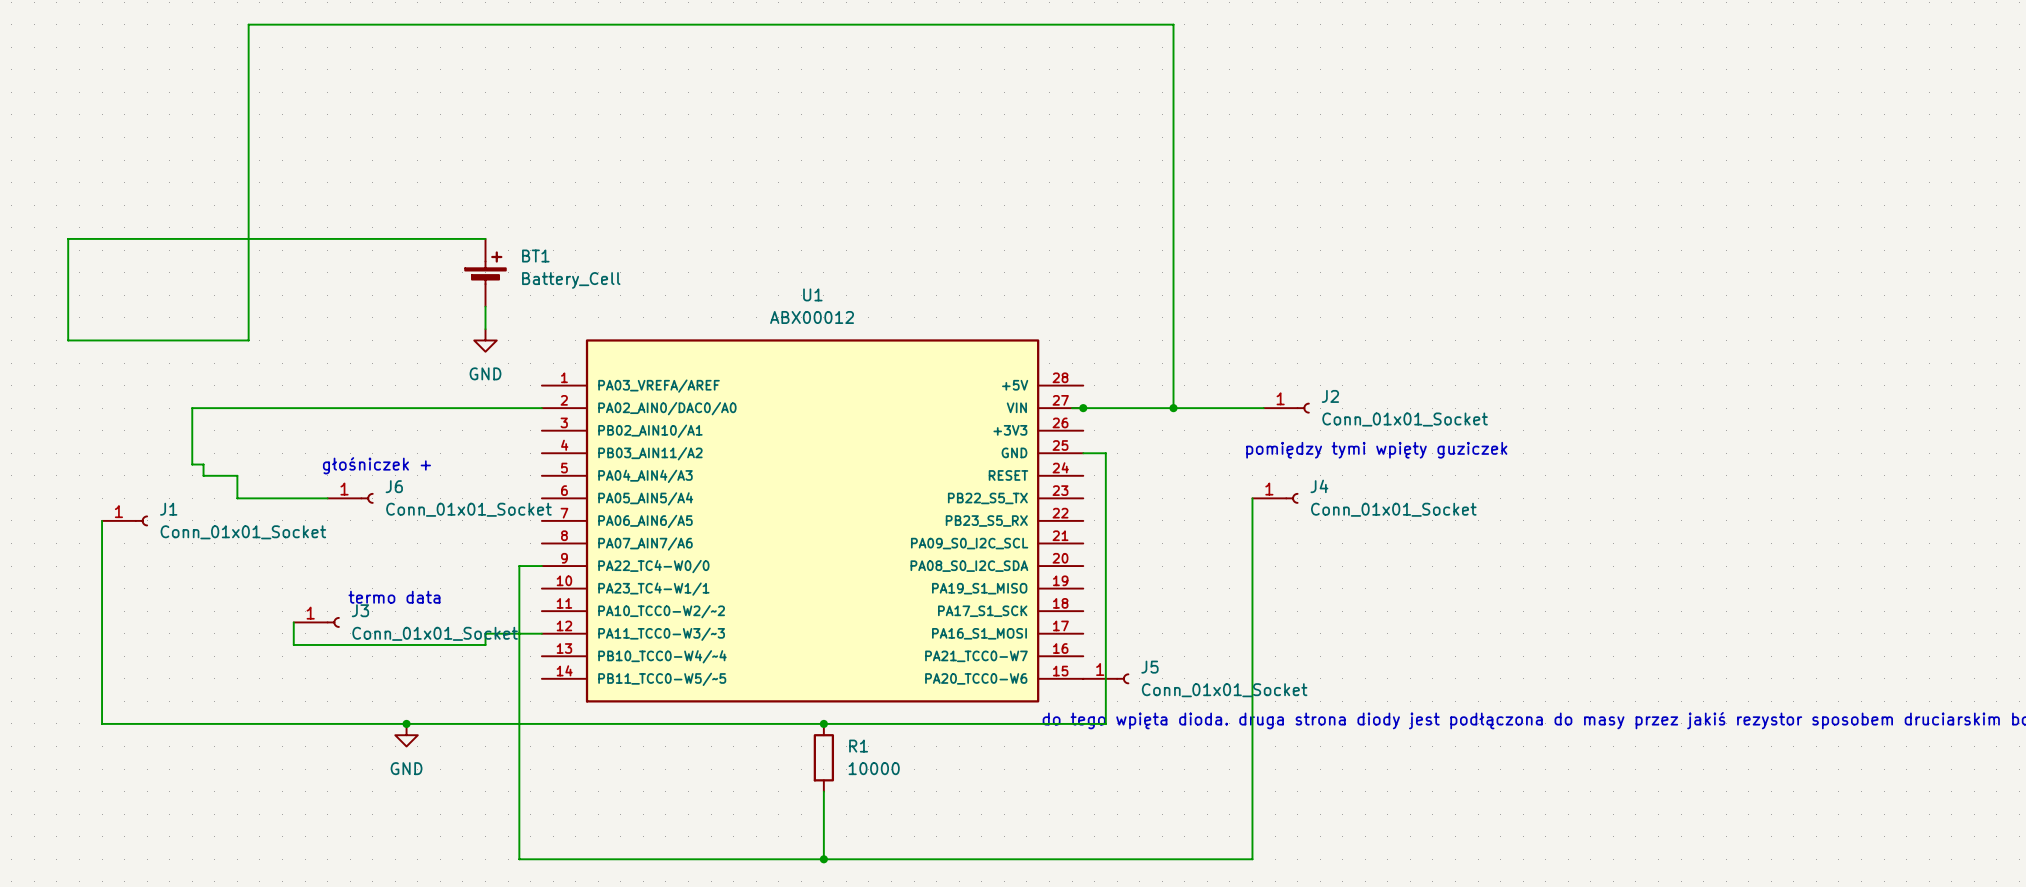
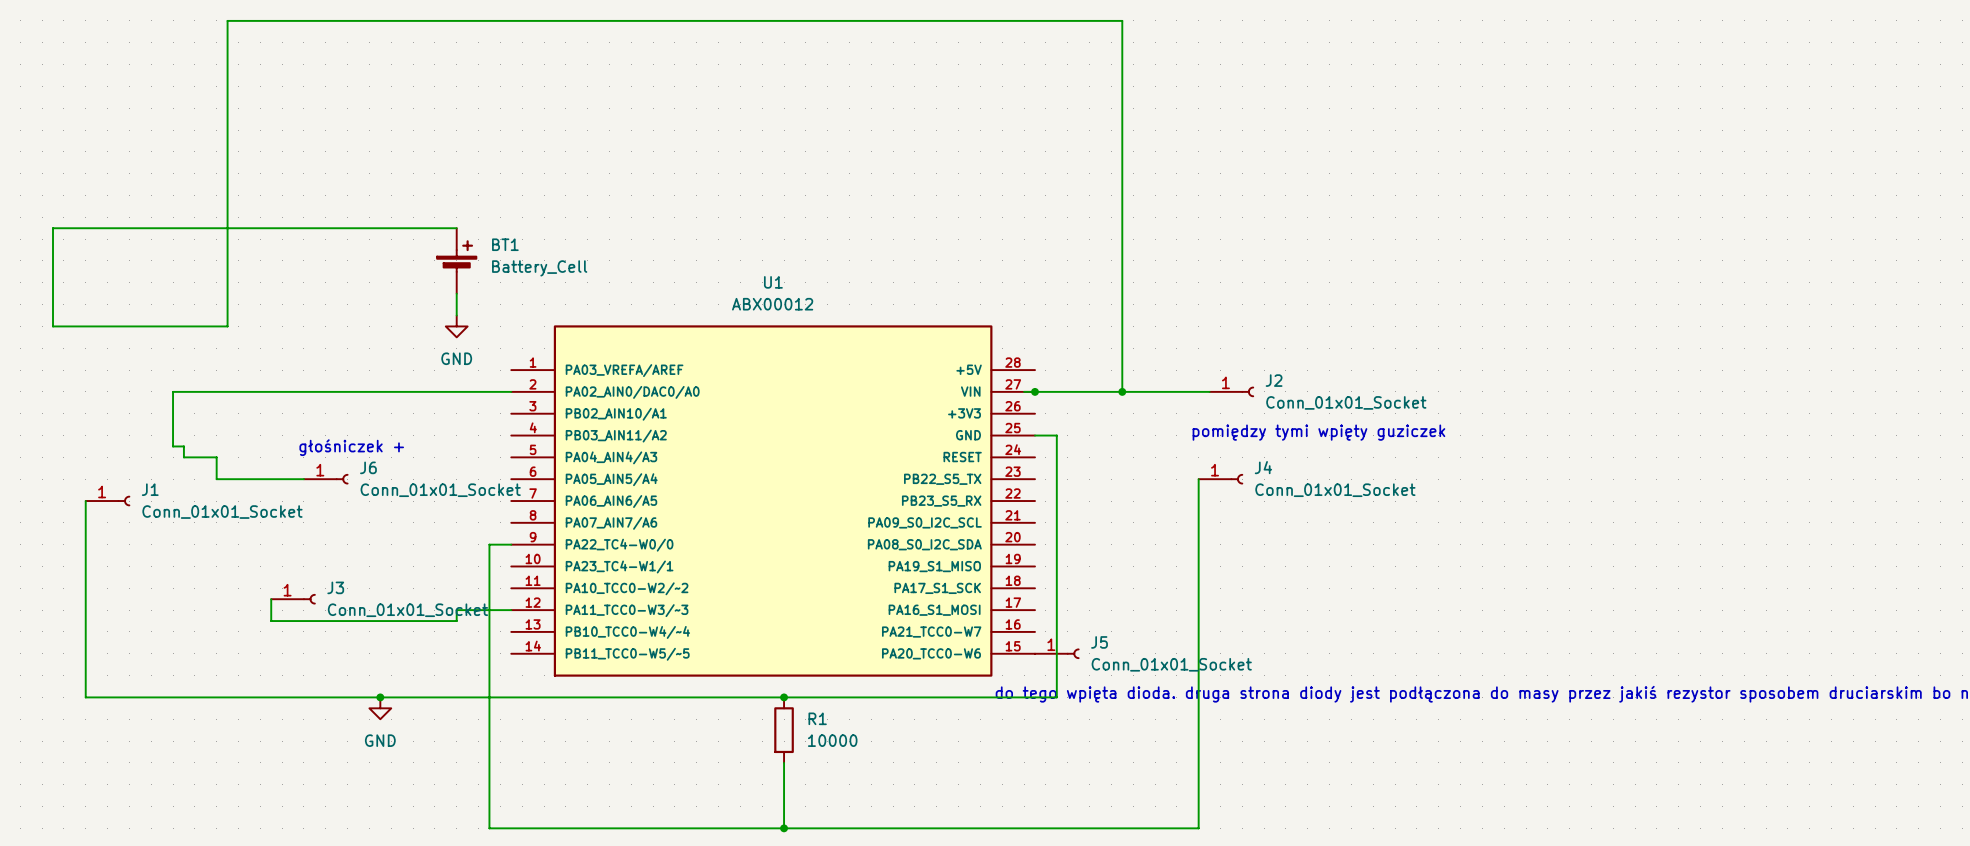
text: termo data (394, 597) -> none

